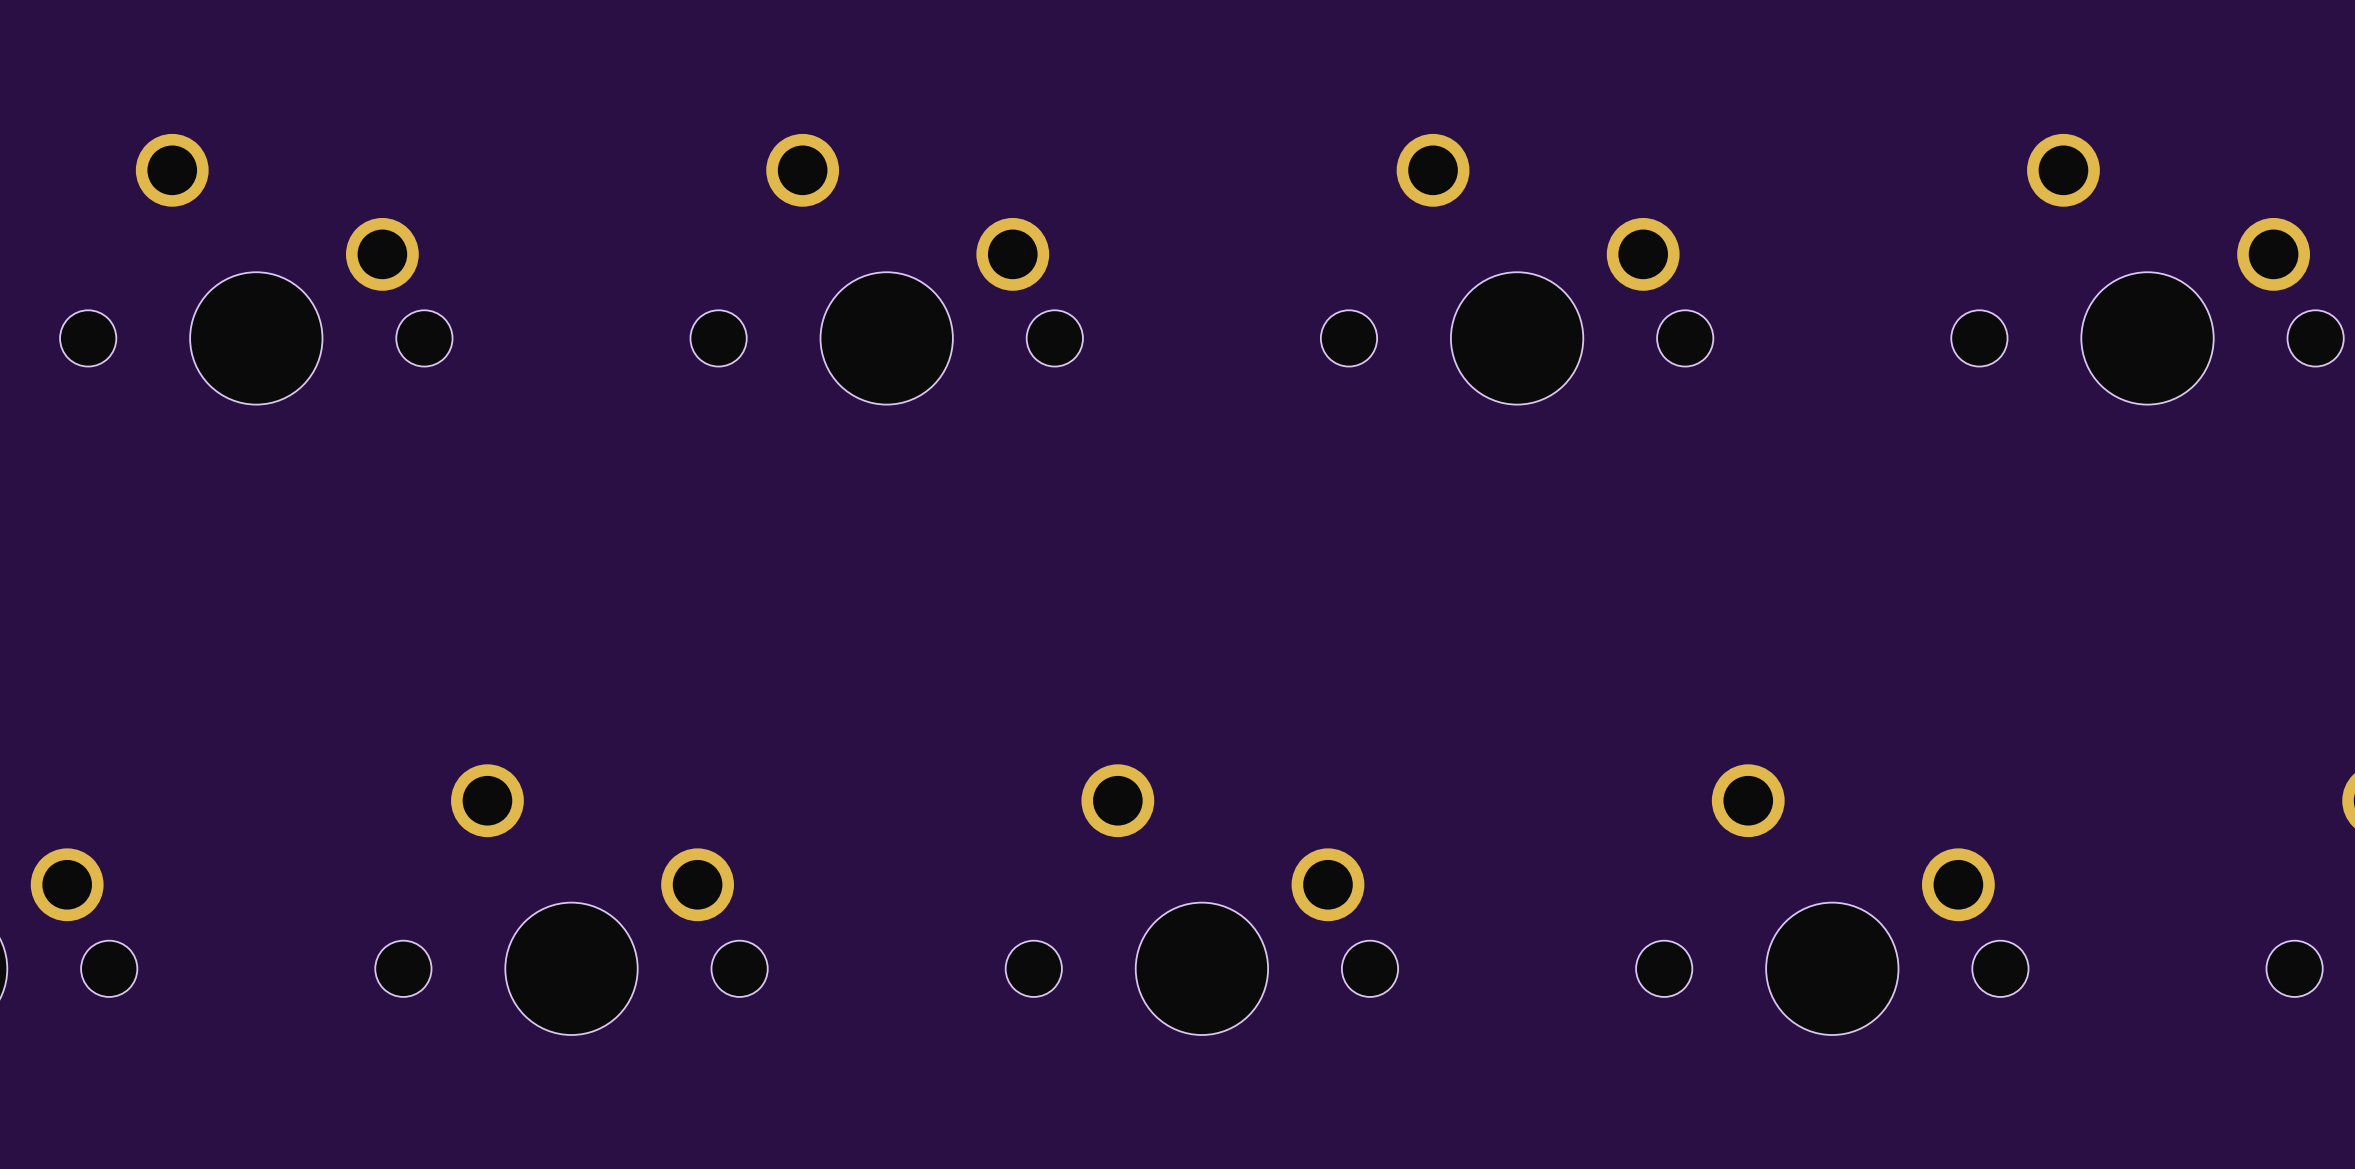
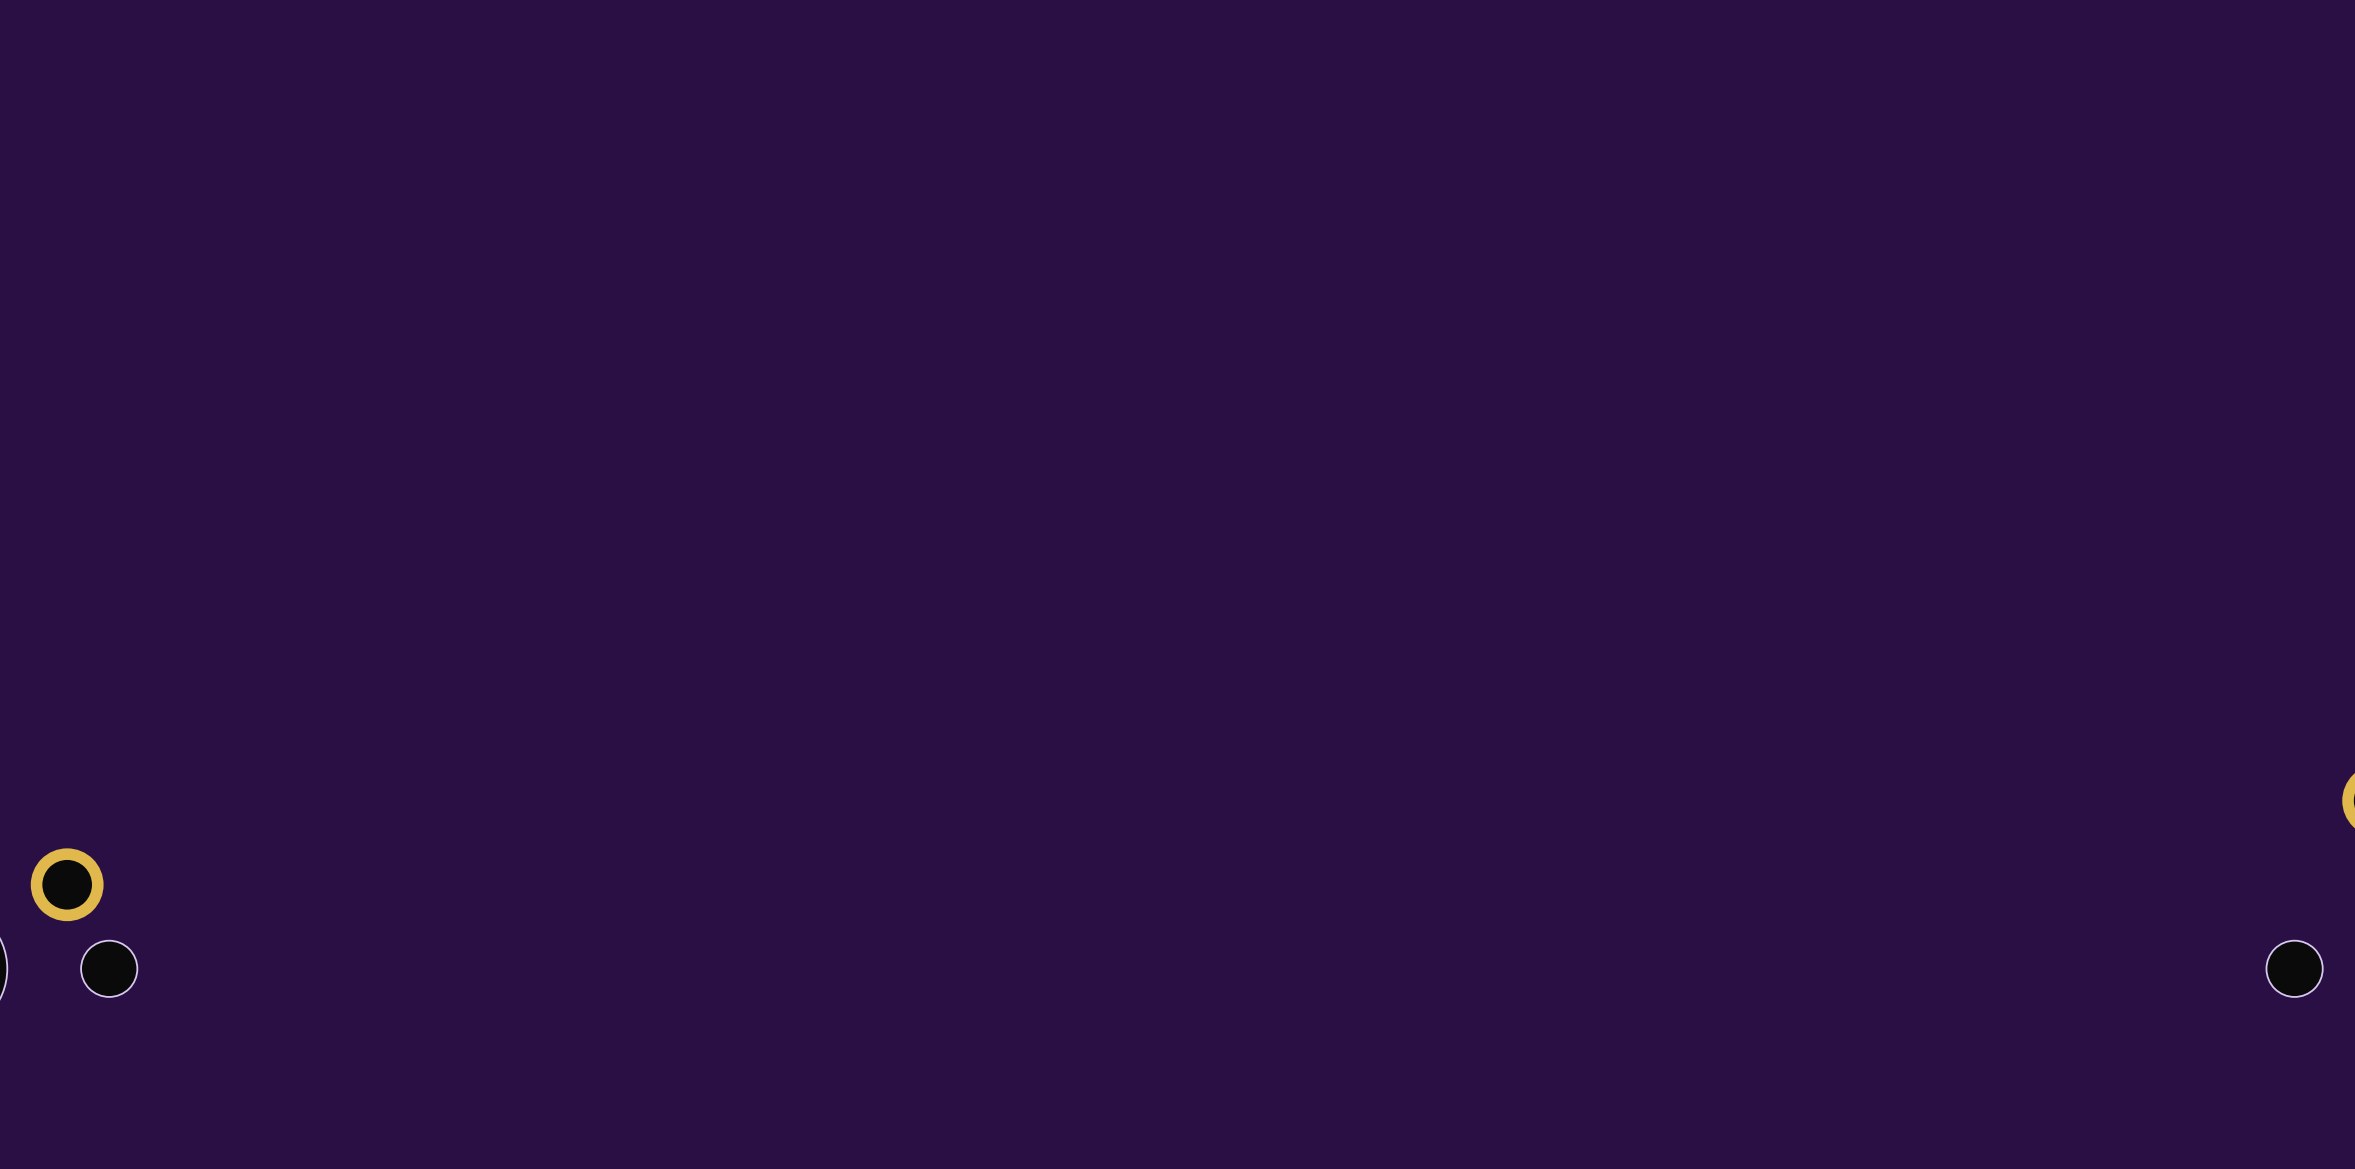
part: (256, 269) -> none
part: (886, 269) -> none
part: (1517, 269) -> none
part: (2147, 269) -> none
part: (571, 899) -> none
part: (1201, 899) -> none
part: (1832, 899) -> none

